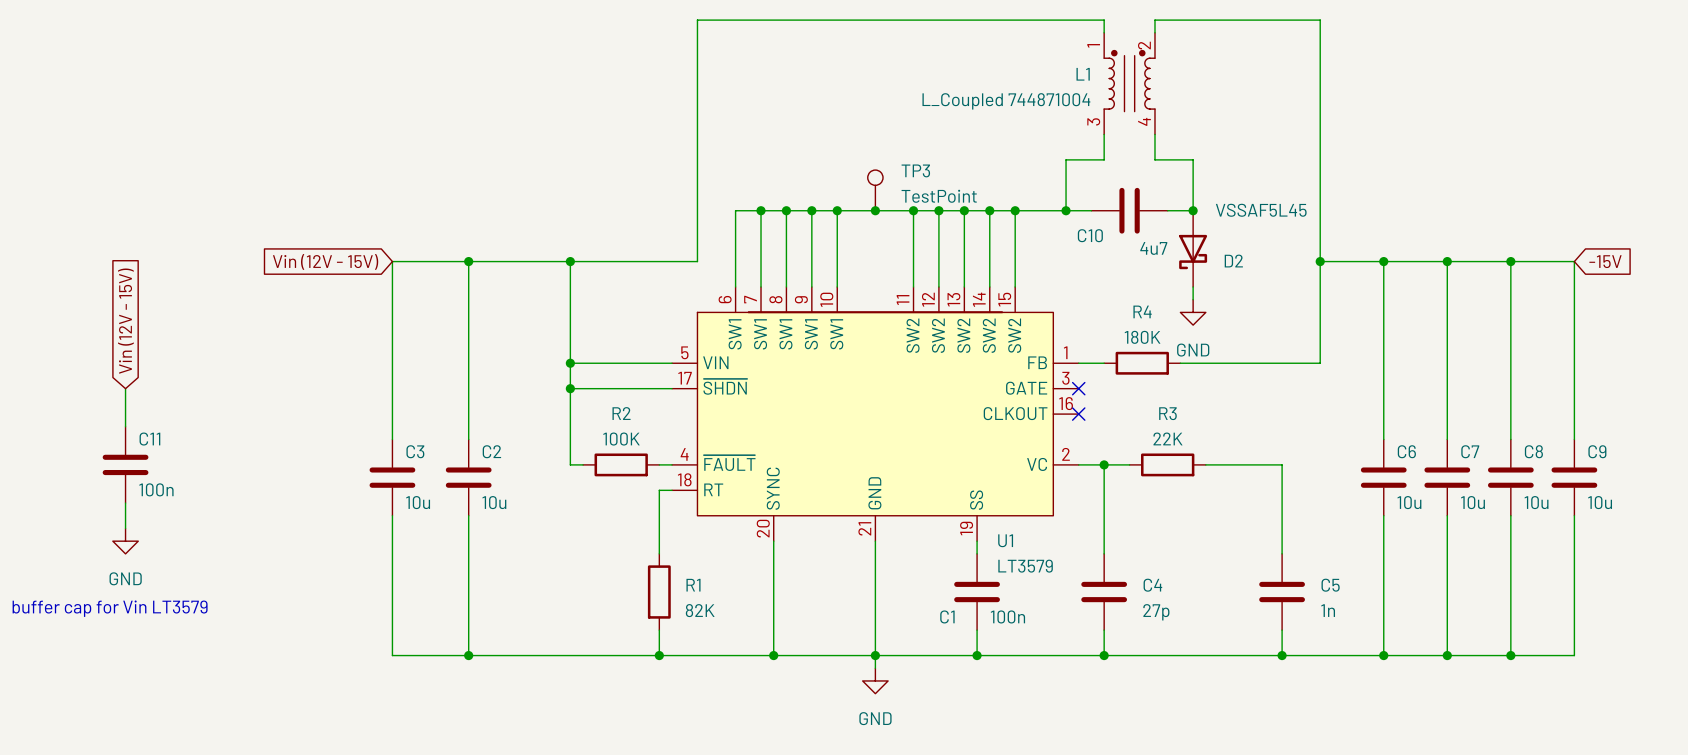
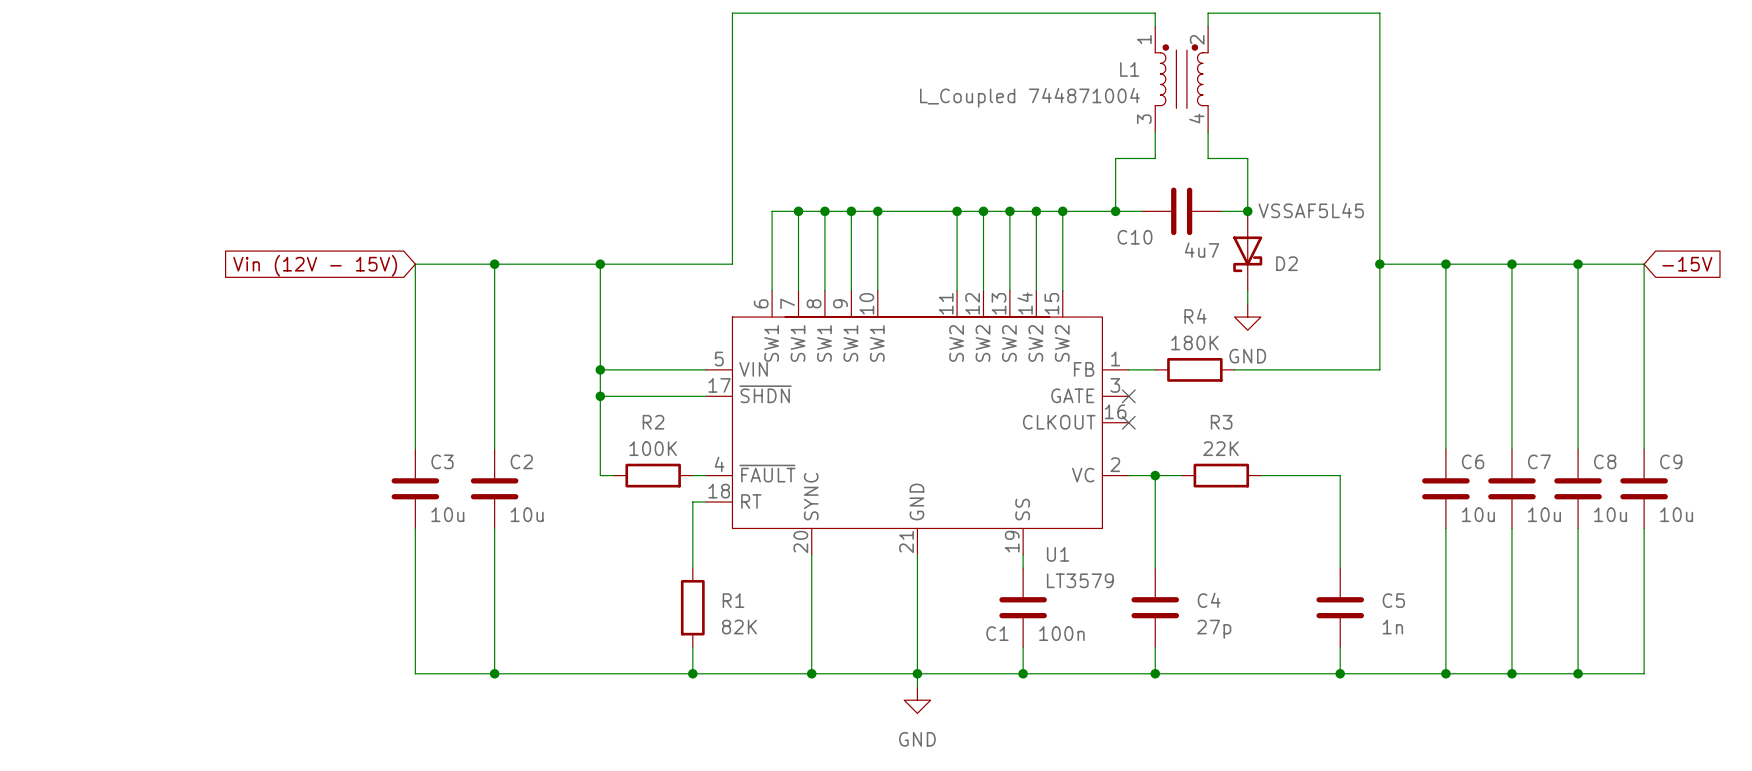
TP3: TestPoint (875, 190) -> none
junction: (875, 210) -> none
global label: Vin (12V - 15V) (125, 321) -> none
wire: (125, 388) (125, 426) -> none
C11: 100n (125, 464) -> none
wire: (125, 503) (125, 528) -> none
power symbol: GND (125, 541) -> none
text: buffer cap for Vin LT3579 (110, 608) -> none

